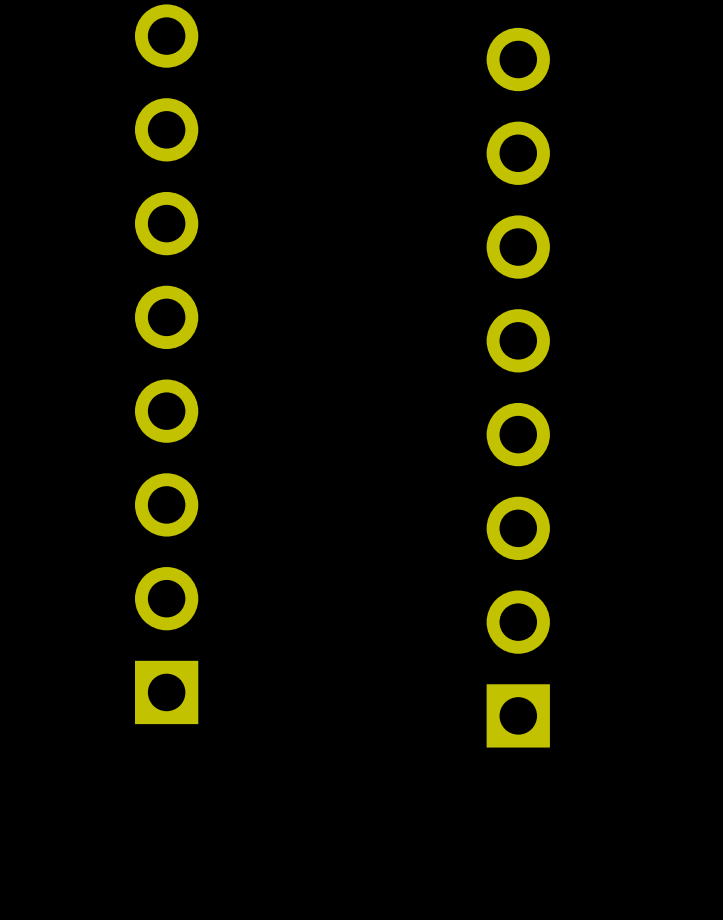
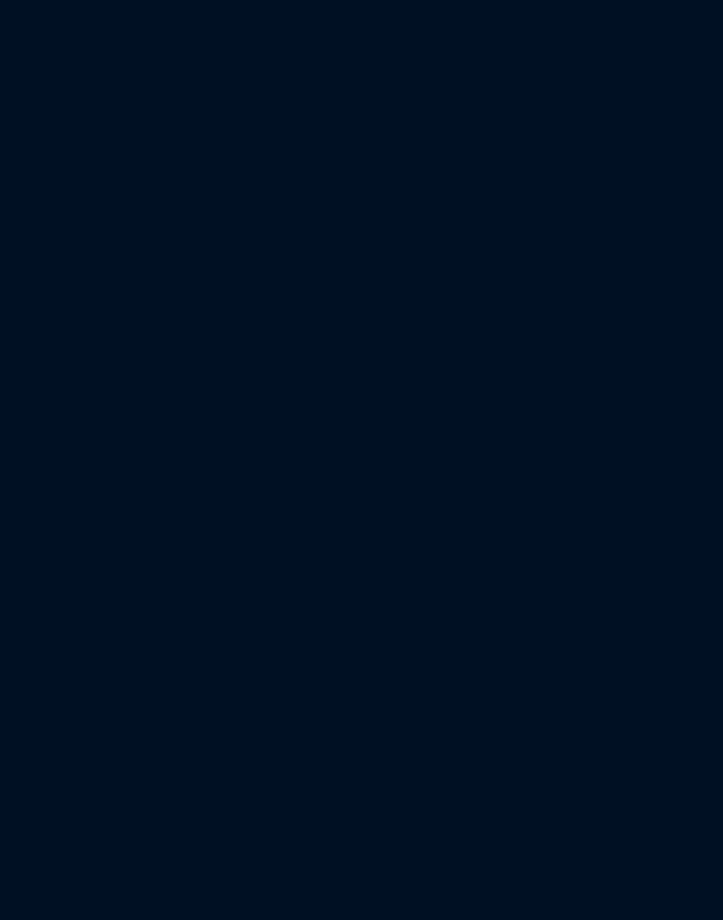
part: (166, 364) -> none
part: (518, 387) -> none

